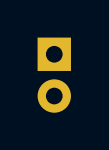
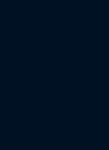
part: (54, 75) -> none

